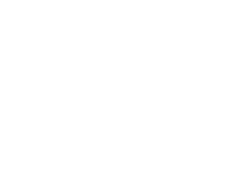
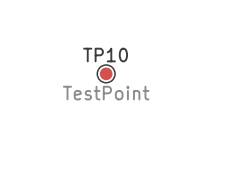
TP10: none -> TestPoint (106, 73)

